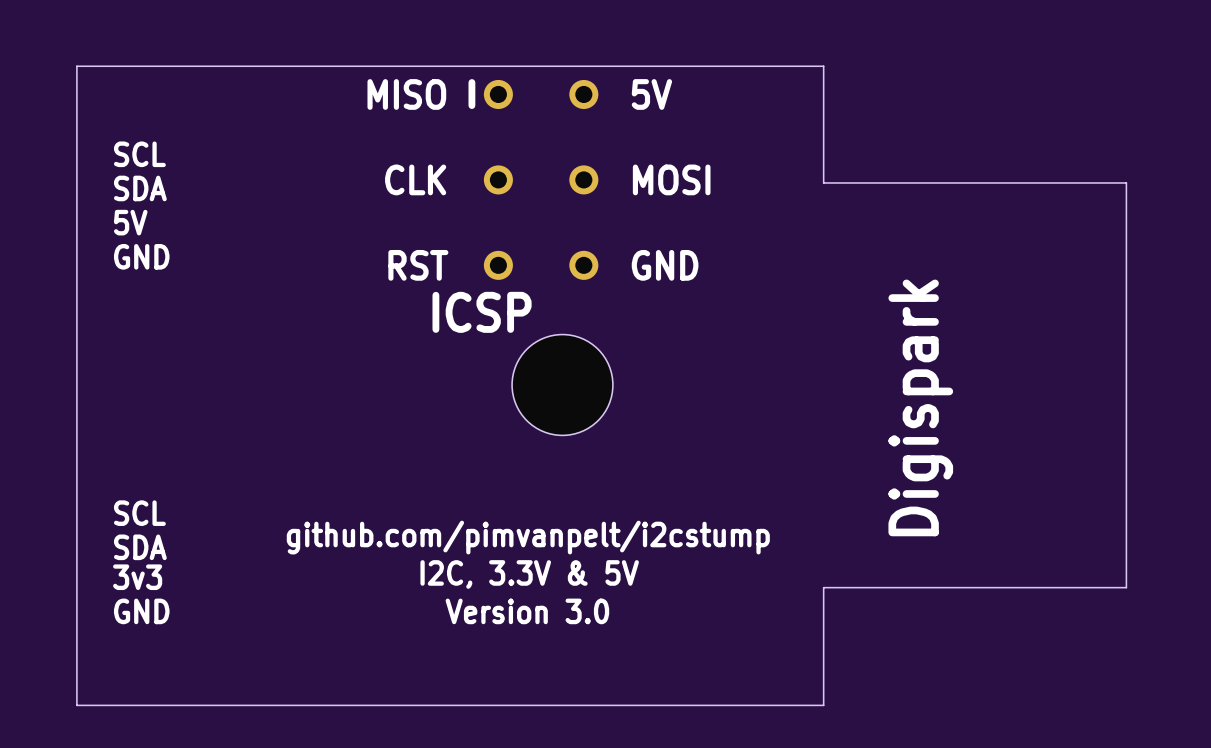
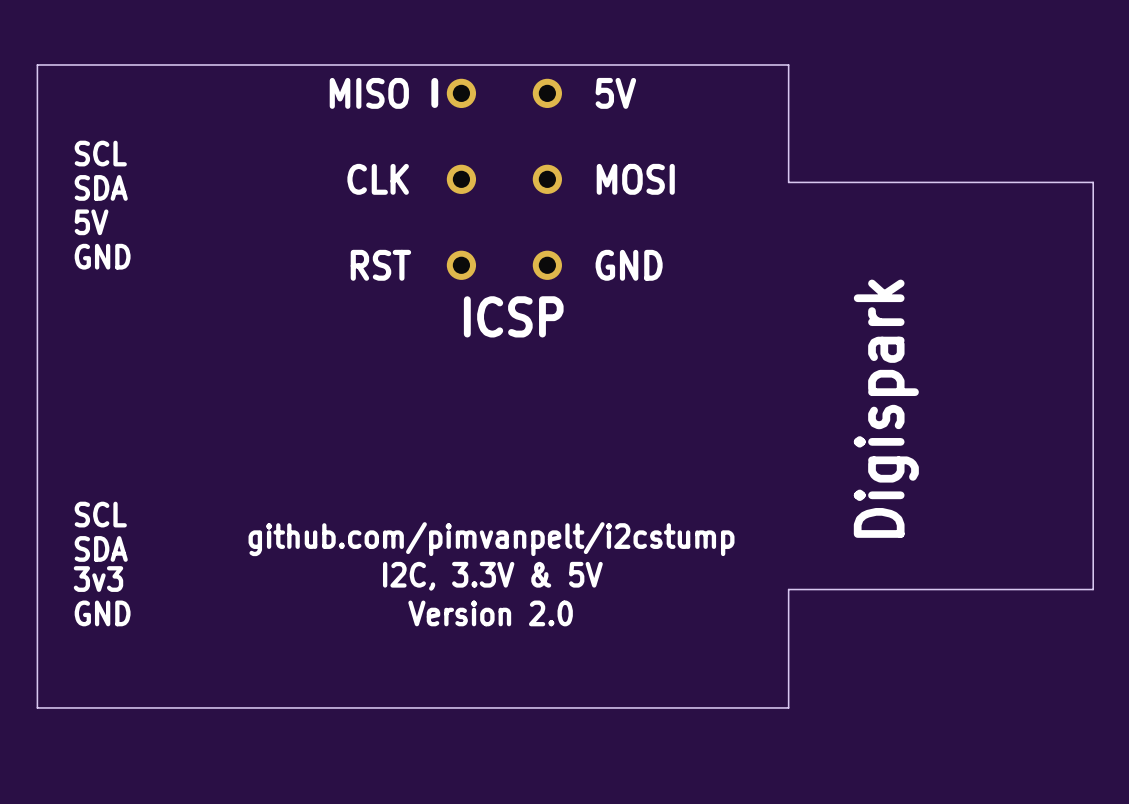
text position: ICSP (482, 312) -> ICSP (513, 316)
hole: (562, 384) -> none
text: Version 3.0 (527, 611) -> Version 2.0 (490, 613)

